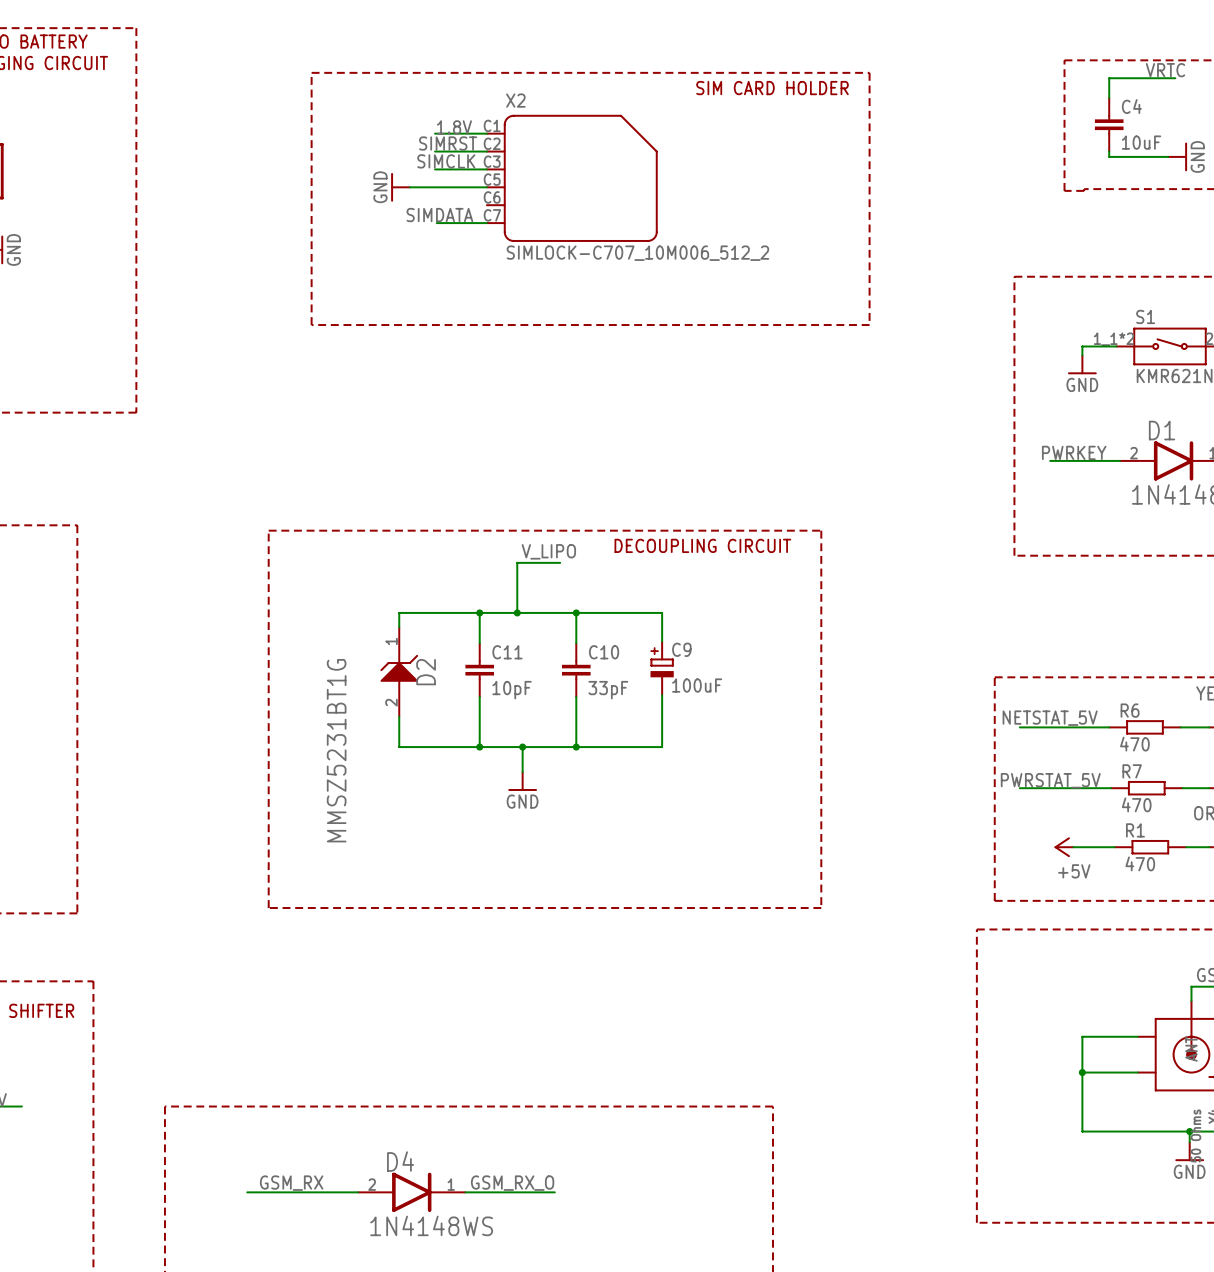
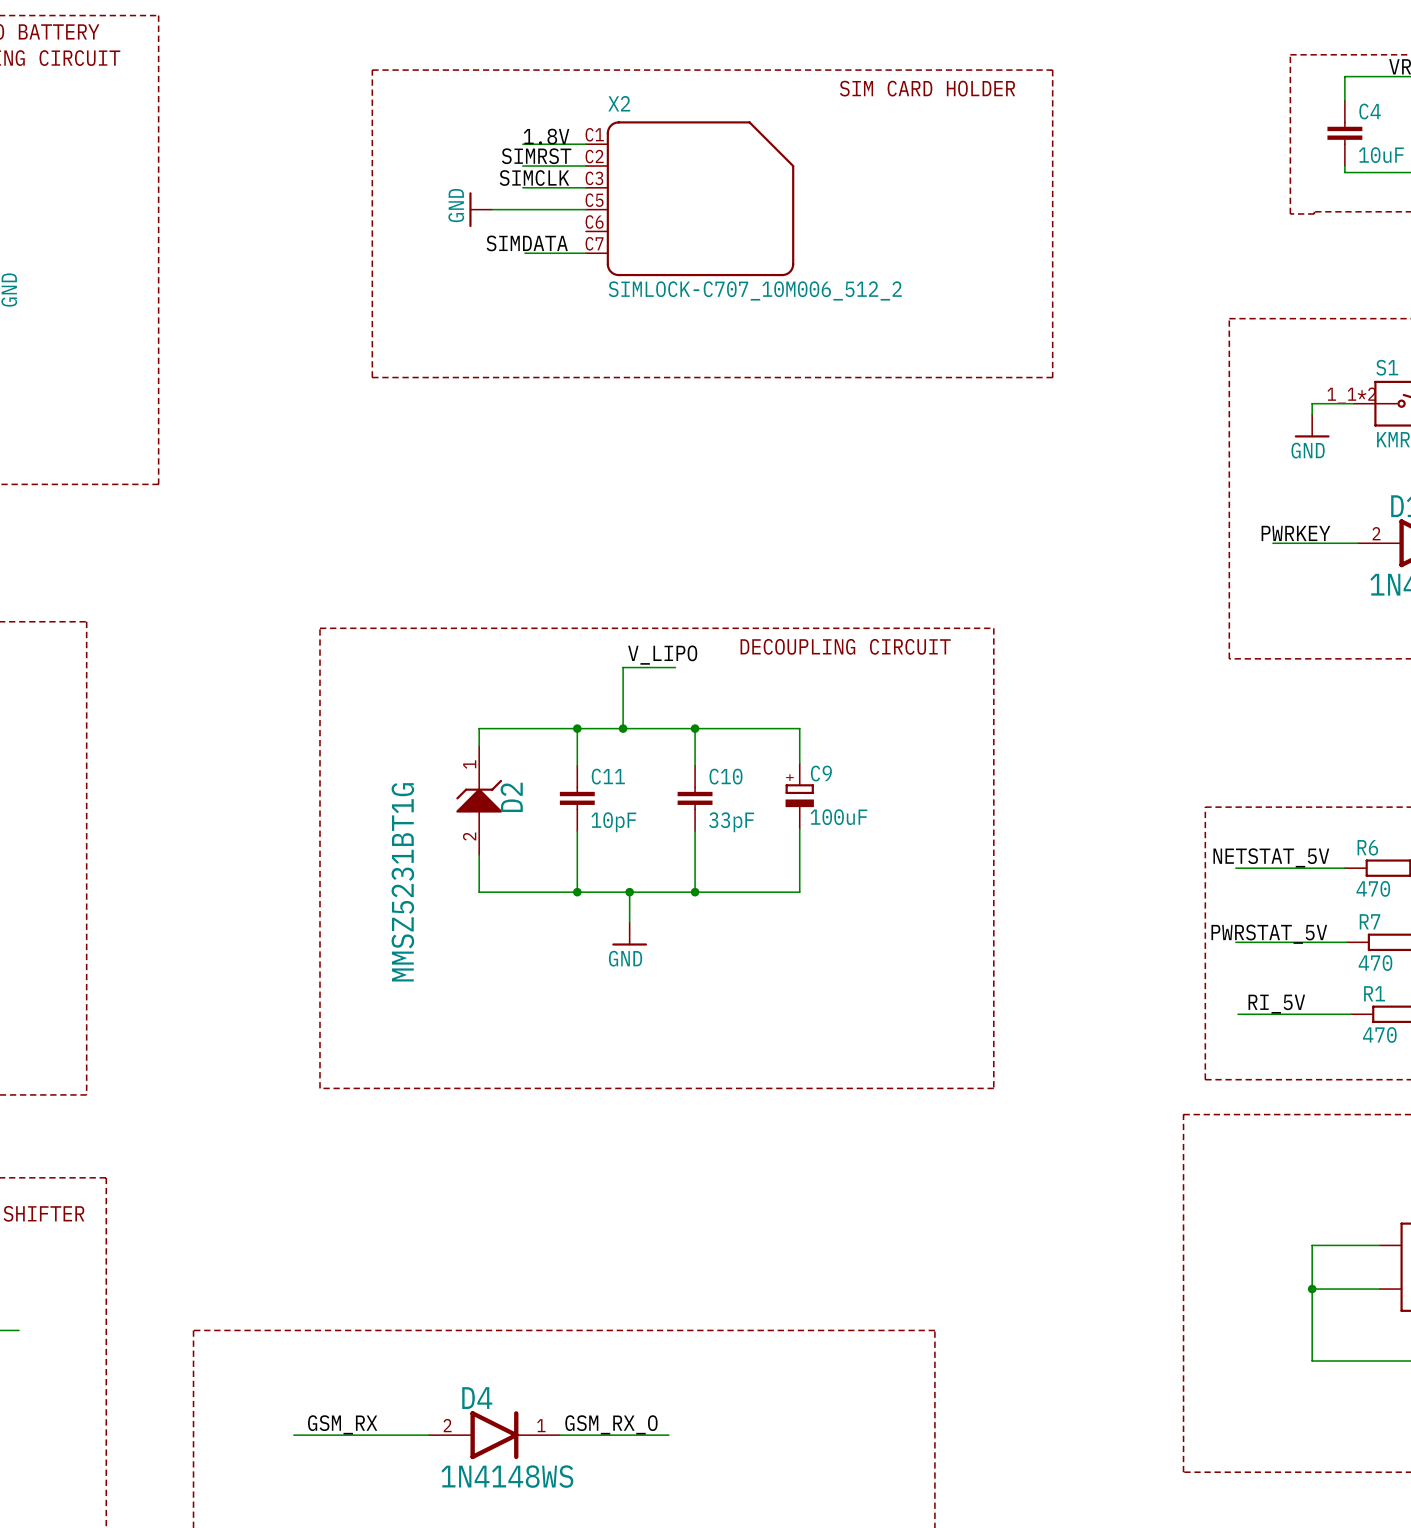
label: none -> RI_5V (1276, 1004)
wire: none -> (1238, 1014) (1301, 1014)
power symbol: +5V (1064, 847) -> none

